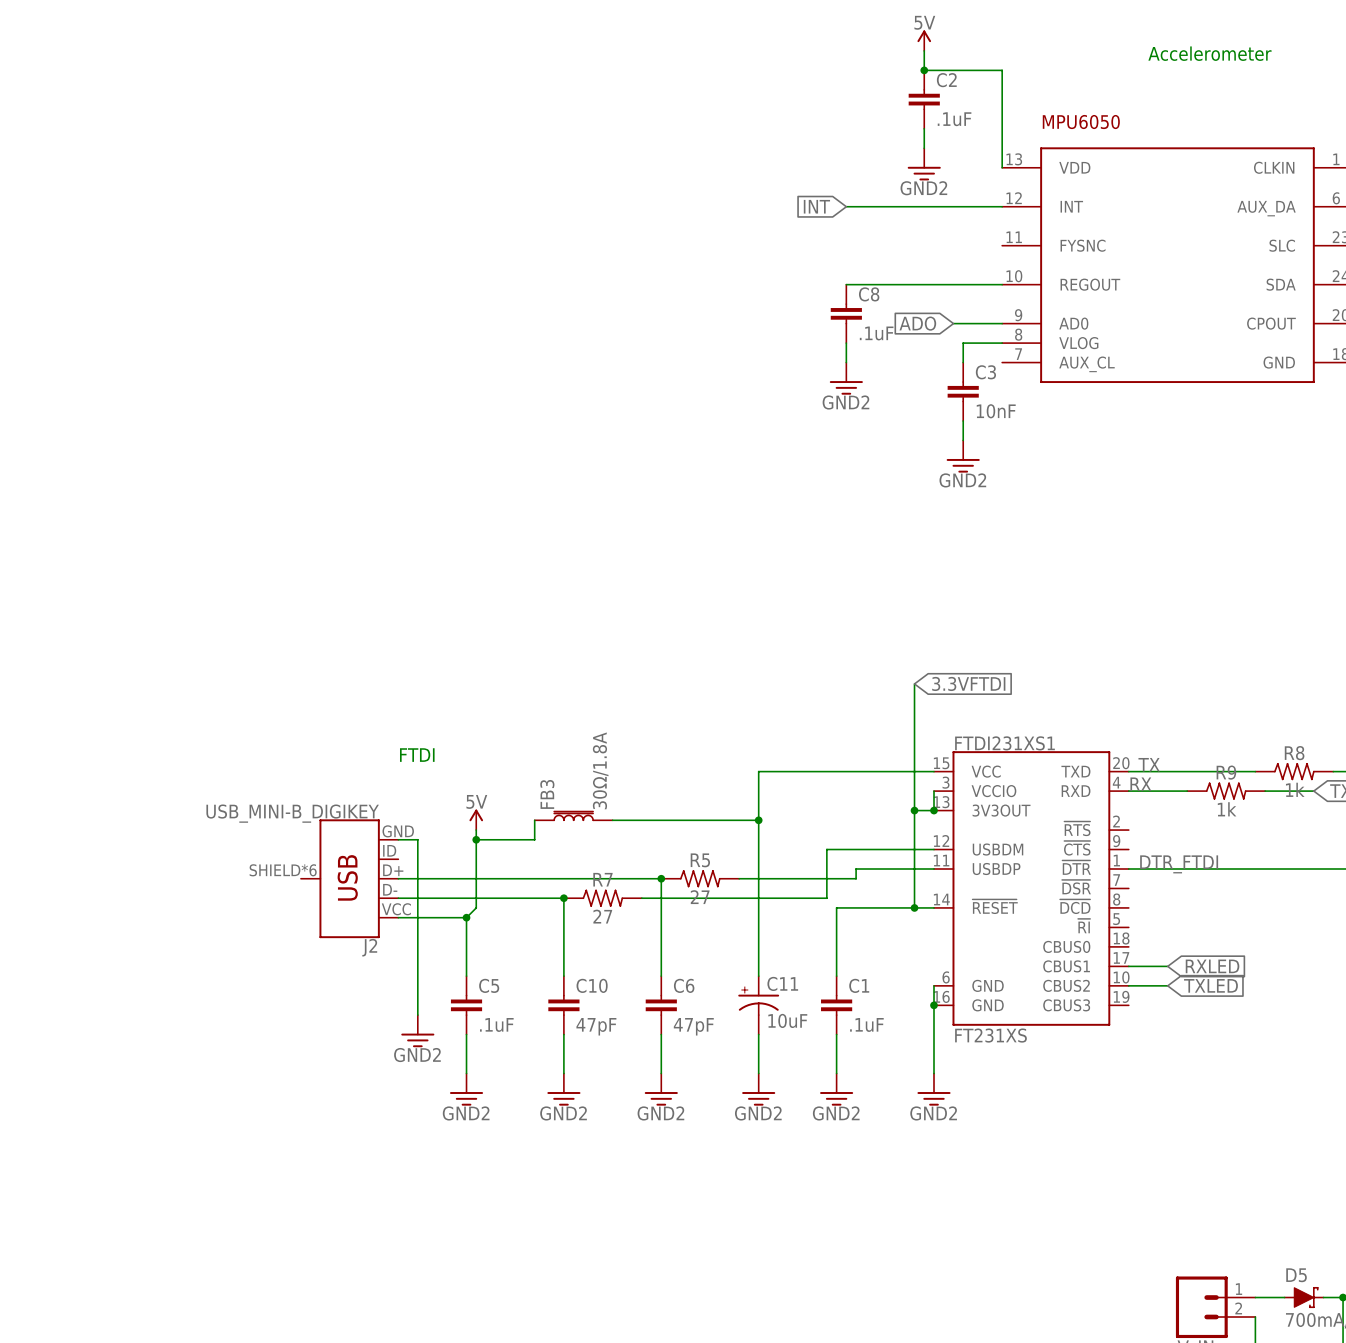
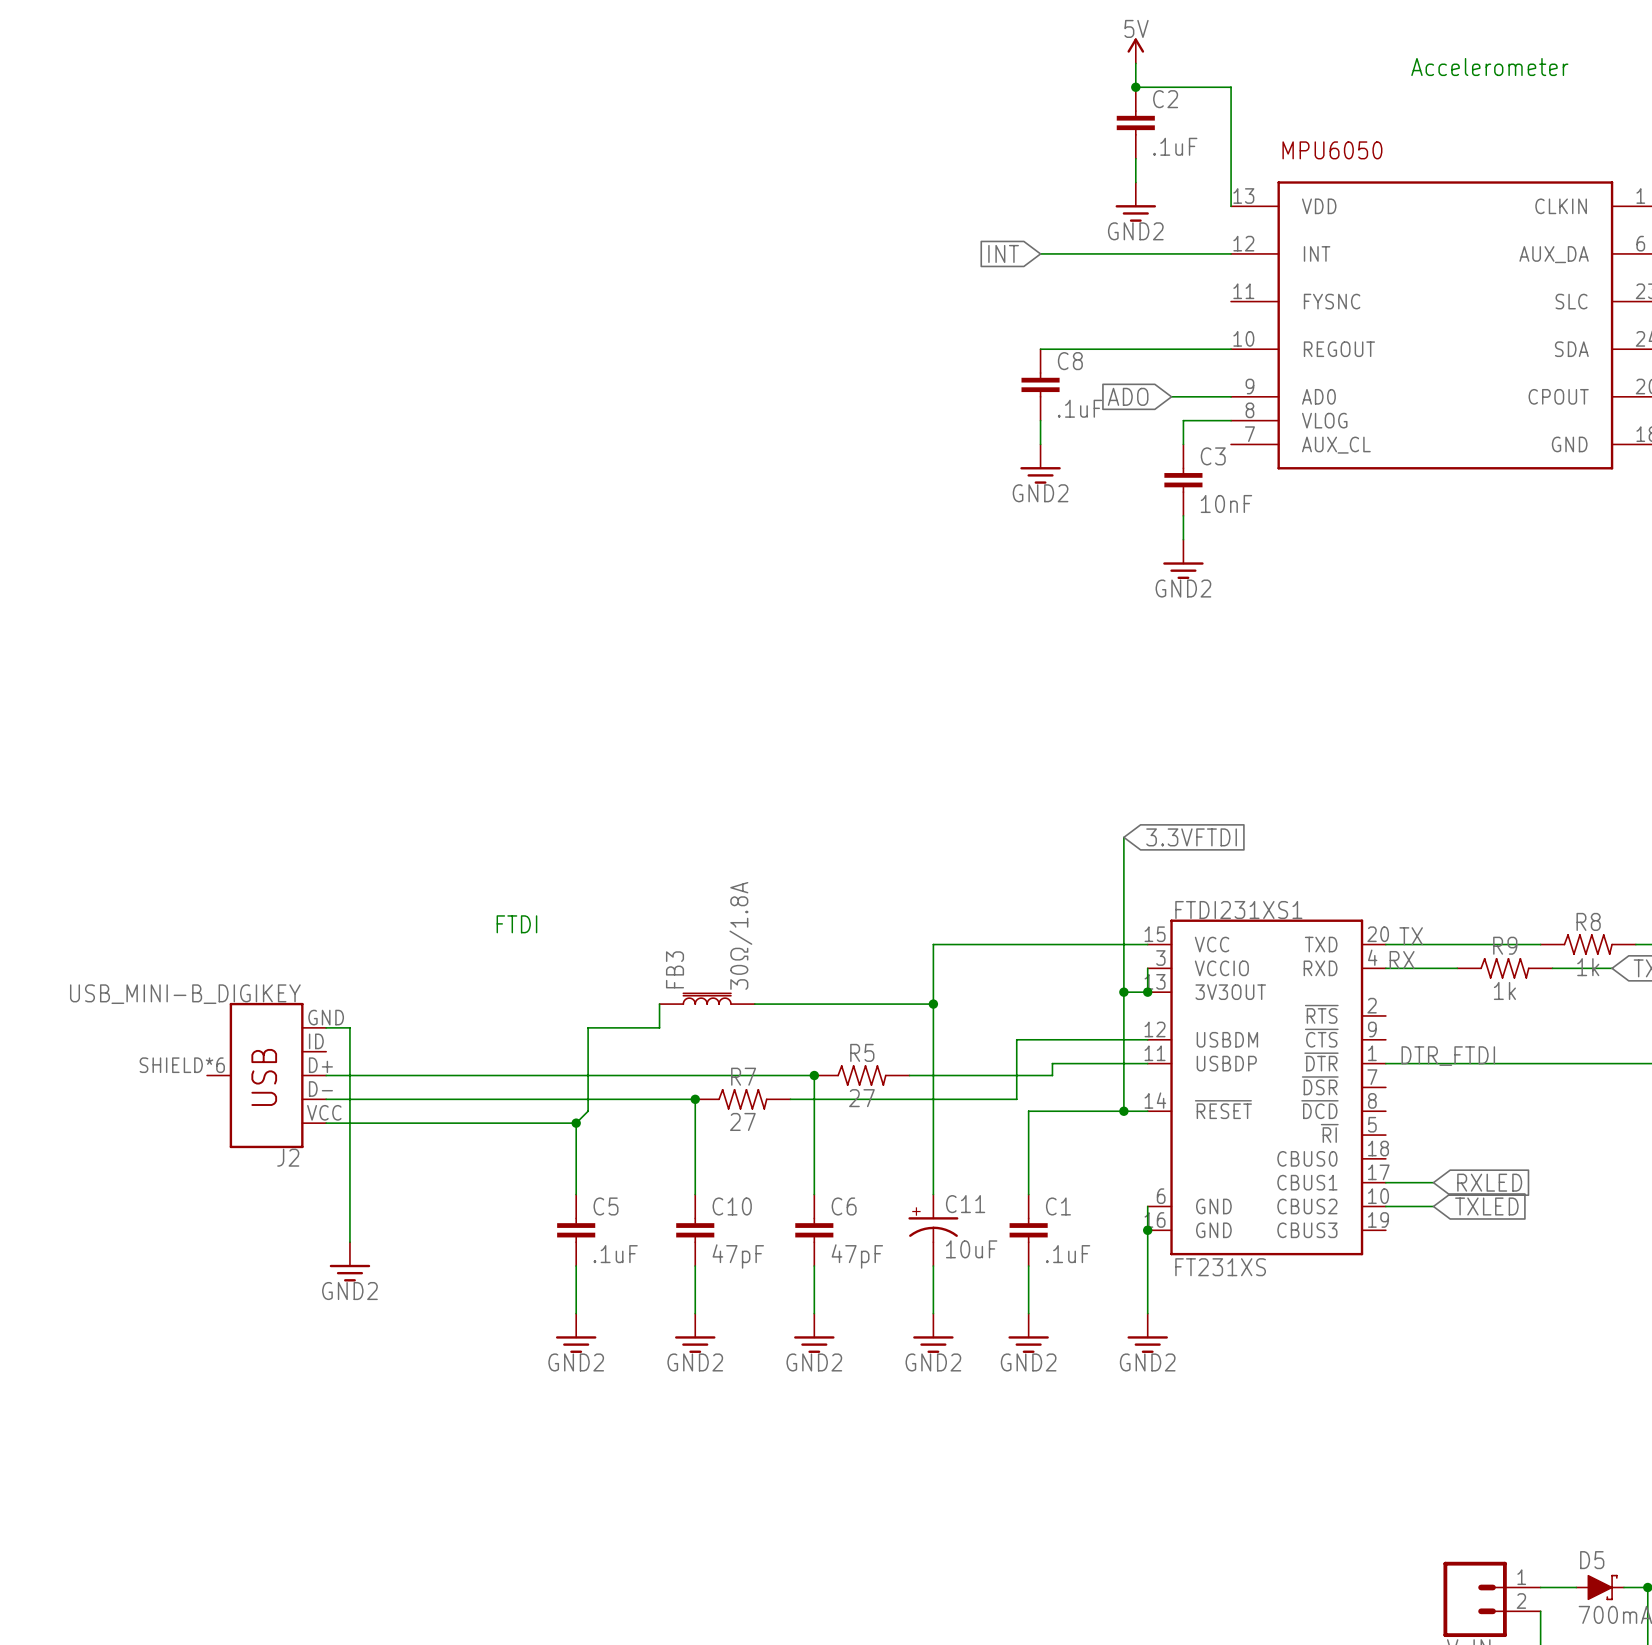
power symbol: 5V (476, 819) -> none
wire: (476, 830) (476, 839) -> none
wire: (398, 839) (417, 839) (417, 1015) -> (326, 1027) (349, 1027) (349, 1242)
junction: (476, 839) -> none
wire: none -> (326, 1075) (492, 1075)
J2 position: (349, 878) -> (266, 1075)
wire: none -> (326, 1099) (492, 1099)
wire: none -> (326, 1123) (492, 1123)
power symbol position: GND2 (417, 1031) -> GND2 (349, 1261)

